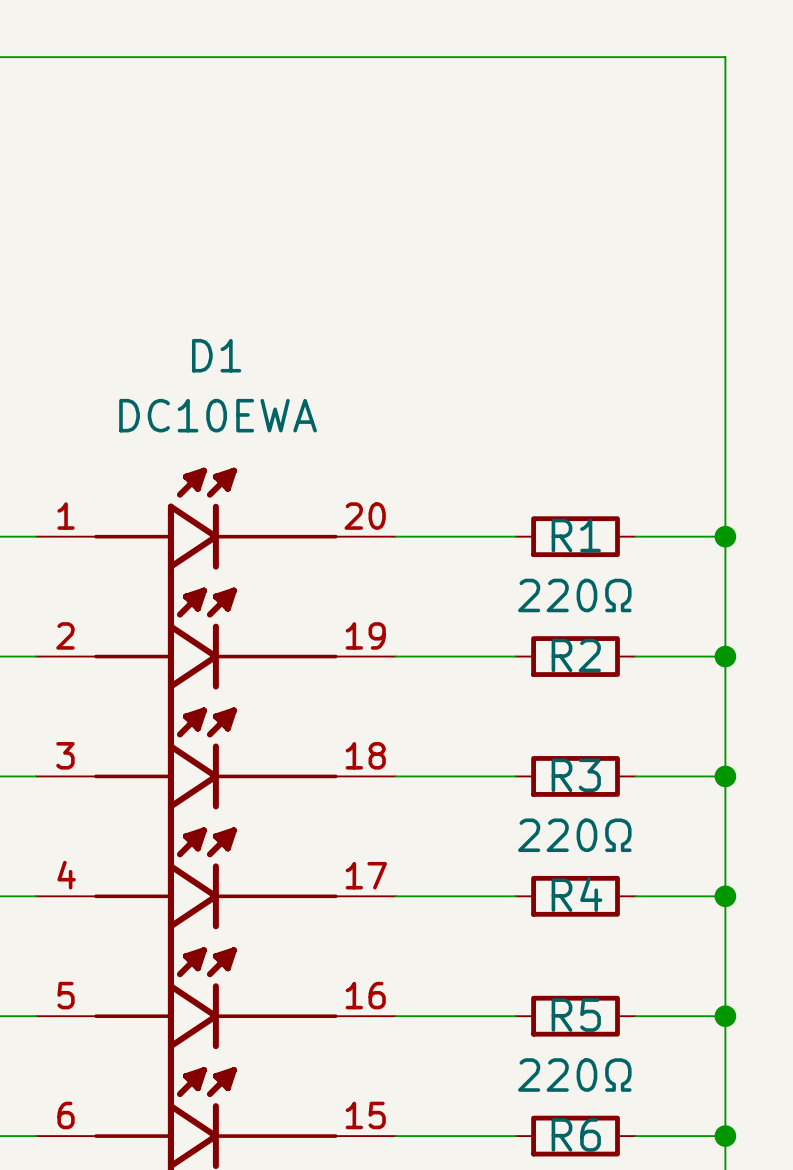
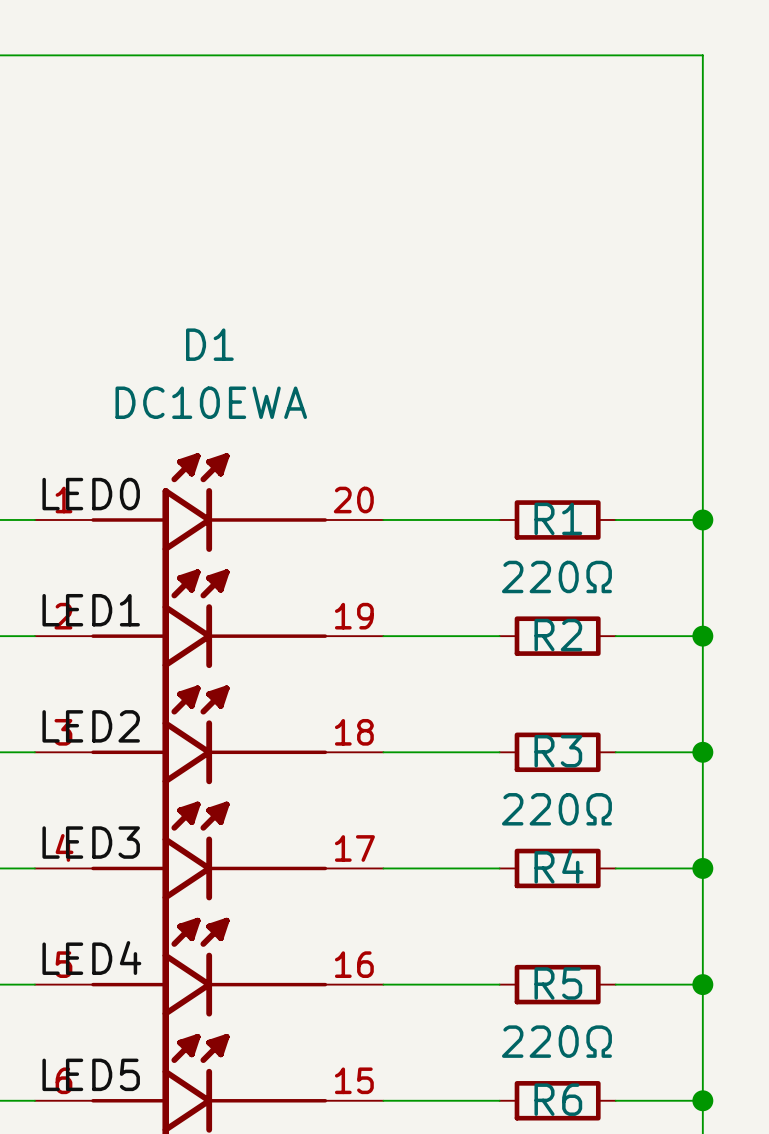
label: none -> LED0 (91, 494)
label: none -> LED1 (91, 610)
label: none -> LED2 (91, 726)
label: none -> LED3 (91, 842)
label: none -> LED4 (91, 958)
label: none -> LED5 (91, 1074)

